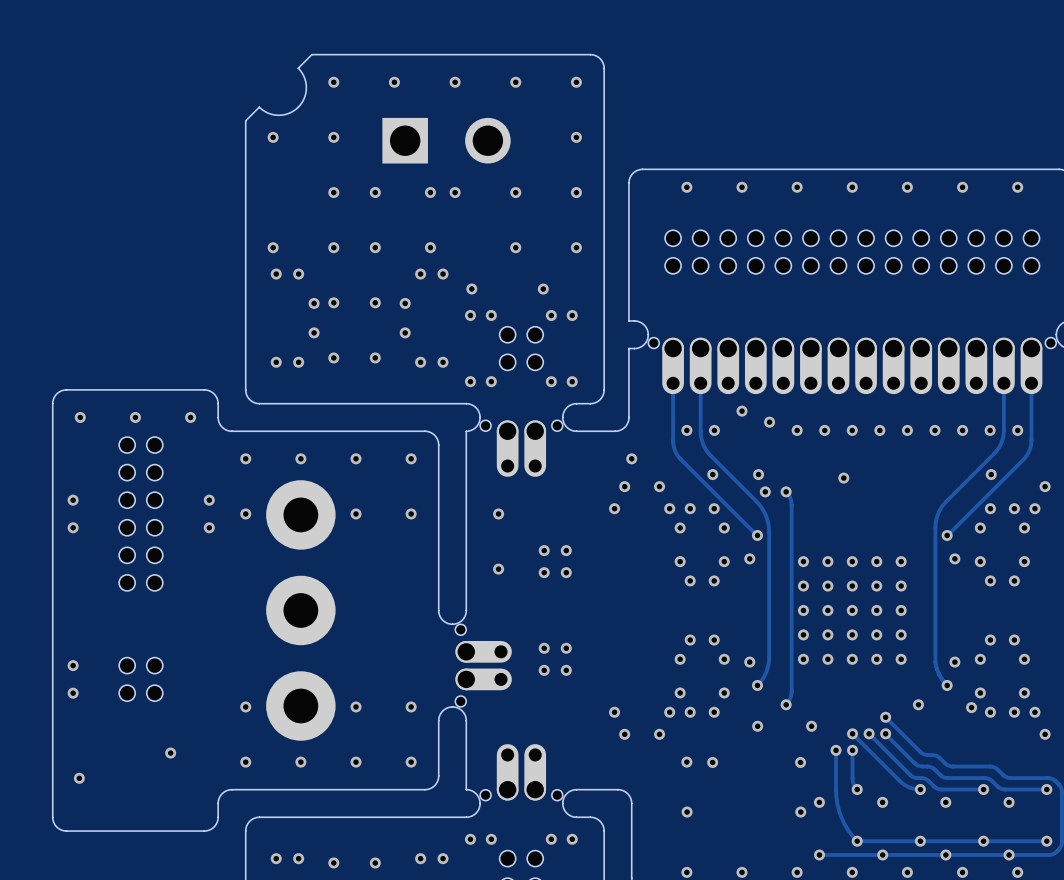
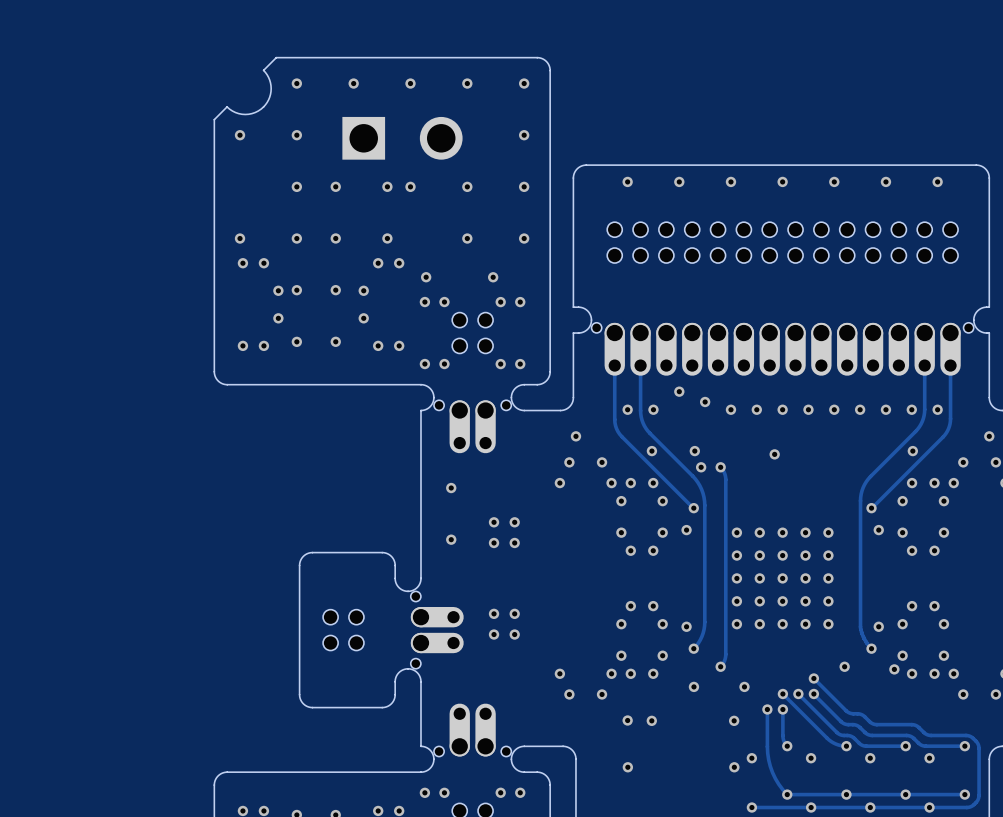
via: (80, 417) -> none
via: (135, 417) -> none
via: (190, 417) -> none
via: (245, 458) -> none
via: (300, 458) -> none
via: (356, 458) -> none
via: (411, 458) -> none
via: (73, 500) -> none
via: (209, 500) -> none
part: (140, 513) -> none
via: (245, 513) -> none
via: (356, 513) -> none
via: (411, 513) -> none
via: (73, 527) -> none
via: (209, 527) -> none
board edge: (438, 596) (438, 445) (436, 437) (430, 432) (228, 430) (223, 428) (218, 422) (216, 396) (205, 389) (66, 389) (59, 392) (54, 397) (52, 817) (57, 828) (66, 831) (207, 830) (212, 828) (217, 821) (220, 796) (230, 789) (428, 789) (434, 785) (438, 778) (438, 734) -> (395, 565) (391, 556) (382, 552) (311, 552) (303, 556) (299, 565) (299, 694) (302, 702) (311, 707) (383, 707) (391, 703) (395, 694)
part: (300, 610) -> none
via: (73, 665) -> none
part position: (140, 679) -> (343, 630)
via: (73, 693) -> none
via: (245, 706) -> none
via: (356, 706) -> none
via: (411, 706) -> none
via: (170, 753) -> none
via: (245, 762) -> none
via: (300, 762) -> none
via: (356, 762) -> none
via: (411, 762) -> none
via: (79, 778) -> none

